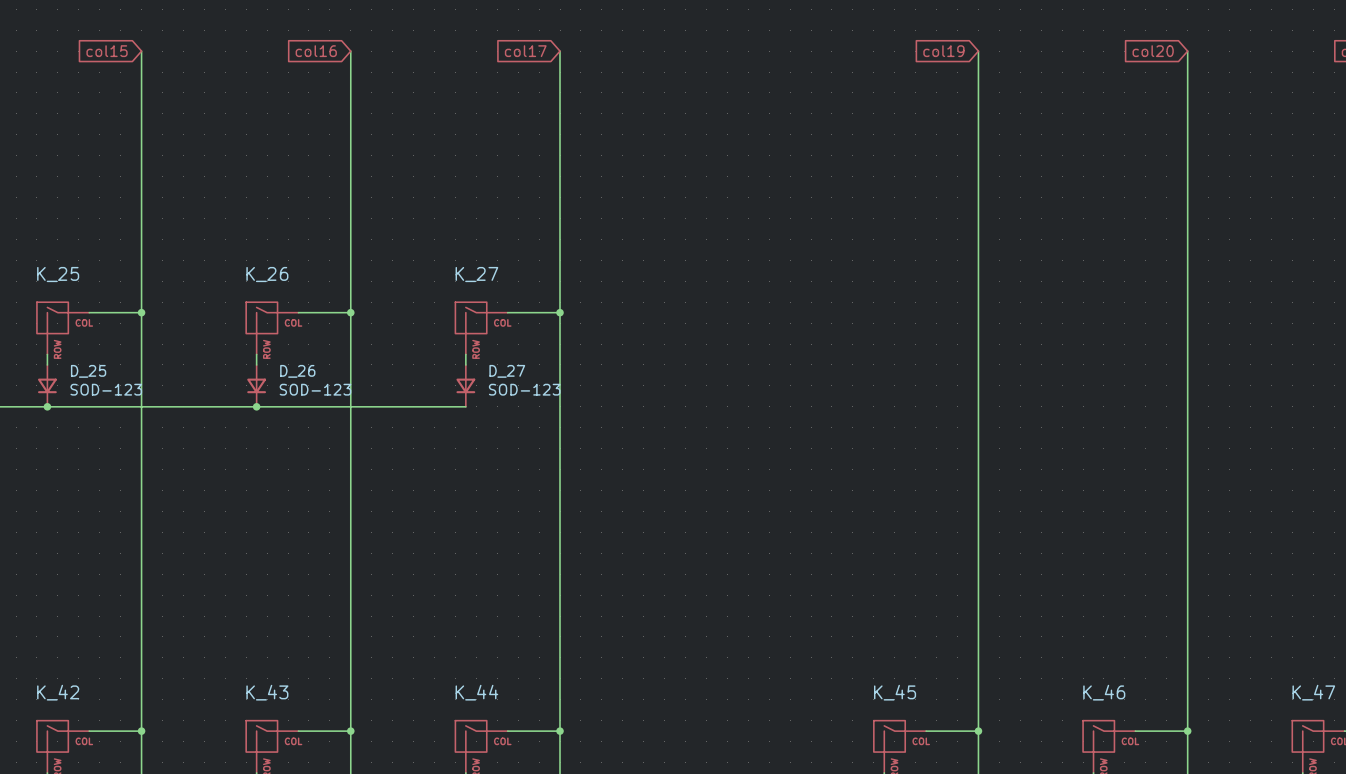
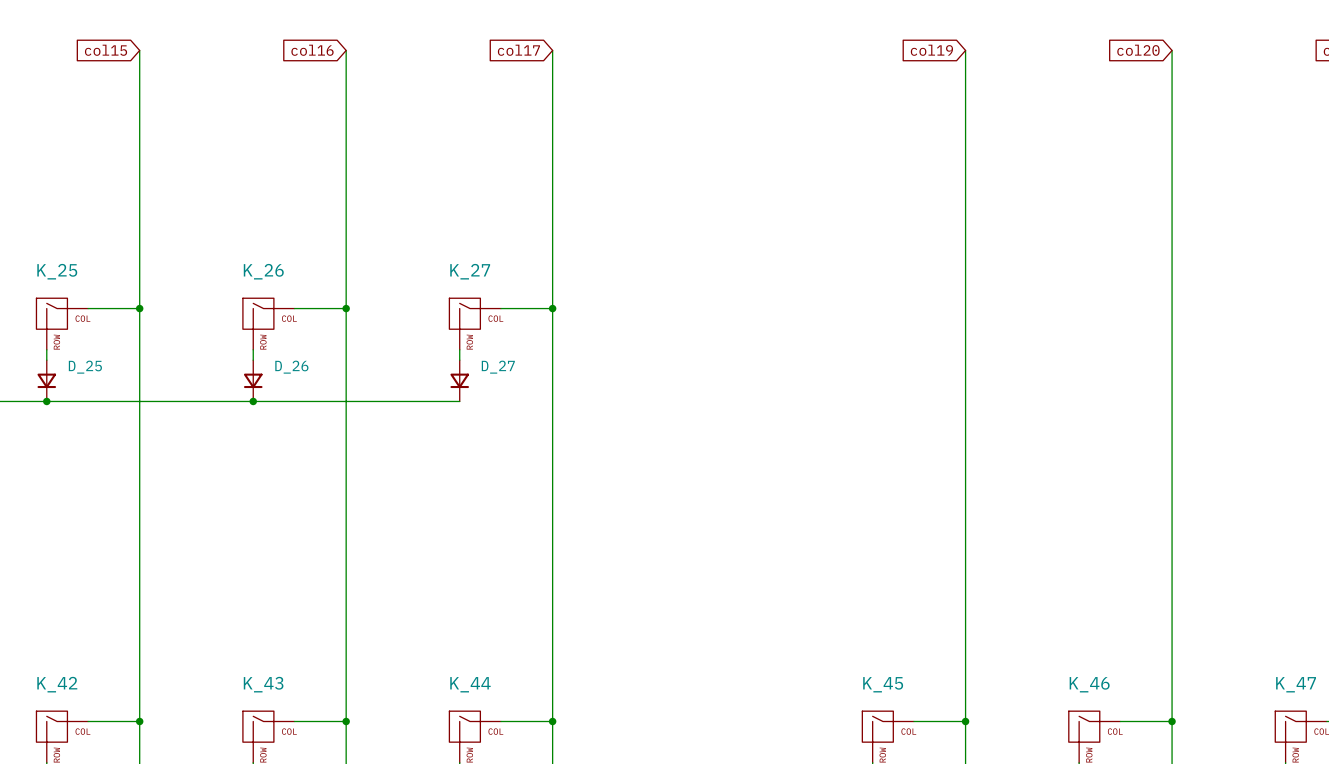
D_25 value: SOD-123 (106, 389) -> none
D_26 value: SOD-123 (315, 389) -> none
D_27 value: SOD-123 (524, 389) -> none

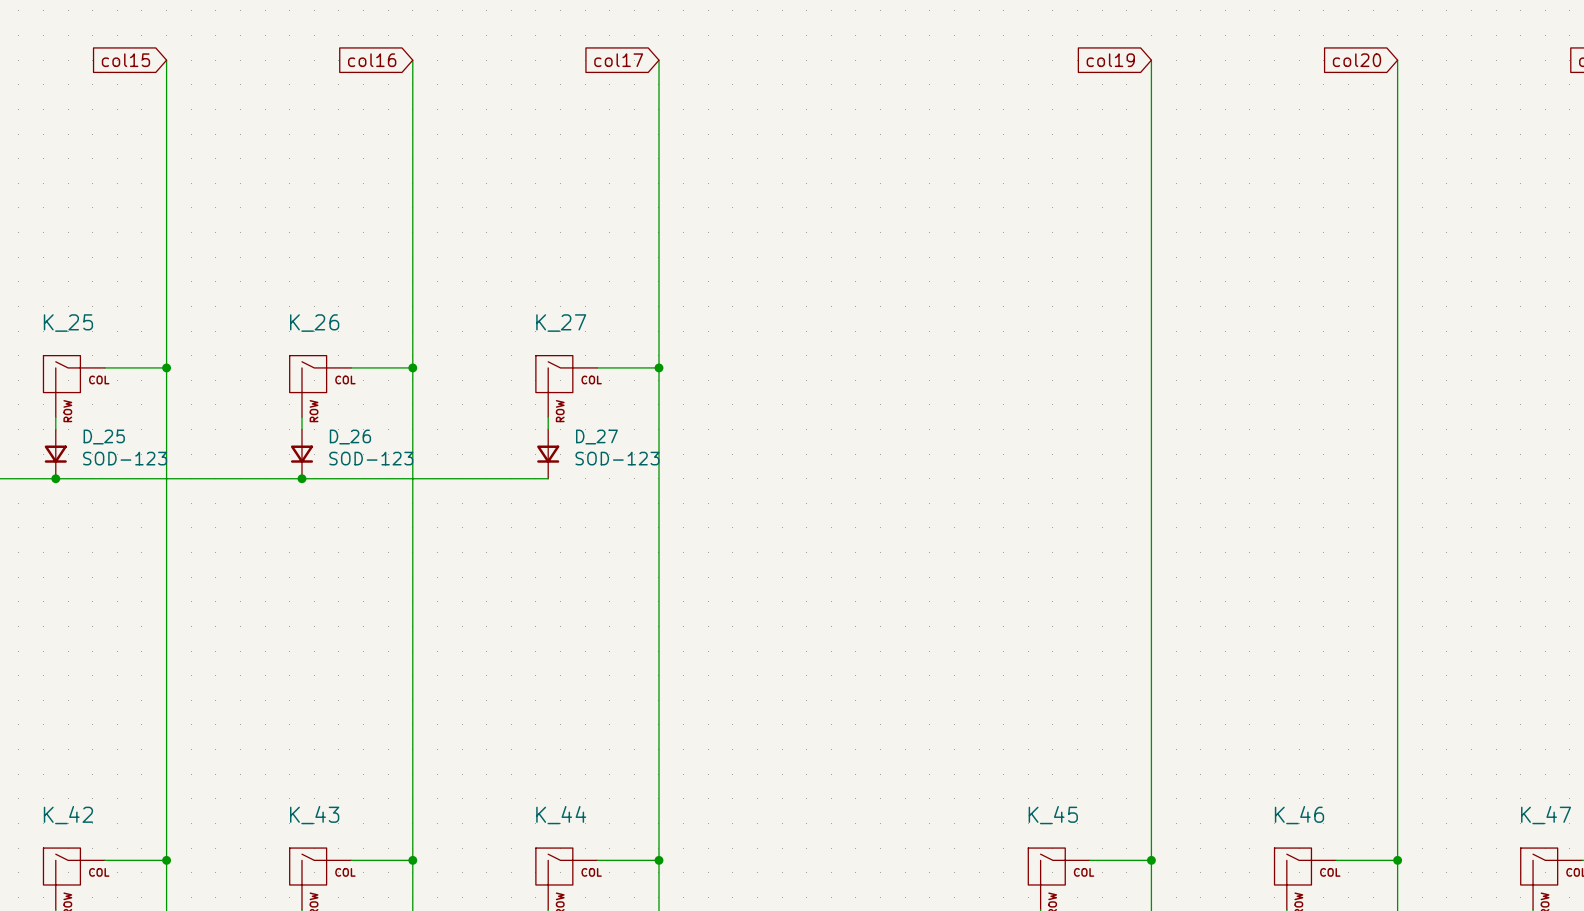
D_25 value: none -> SOD-123 (125, 458)
D_26 value: none -> SOD-123 (371, 458)
D_27 value: none -> SOD-123 (617, 458)

